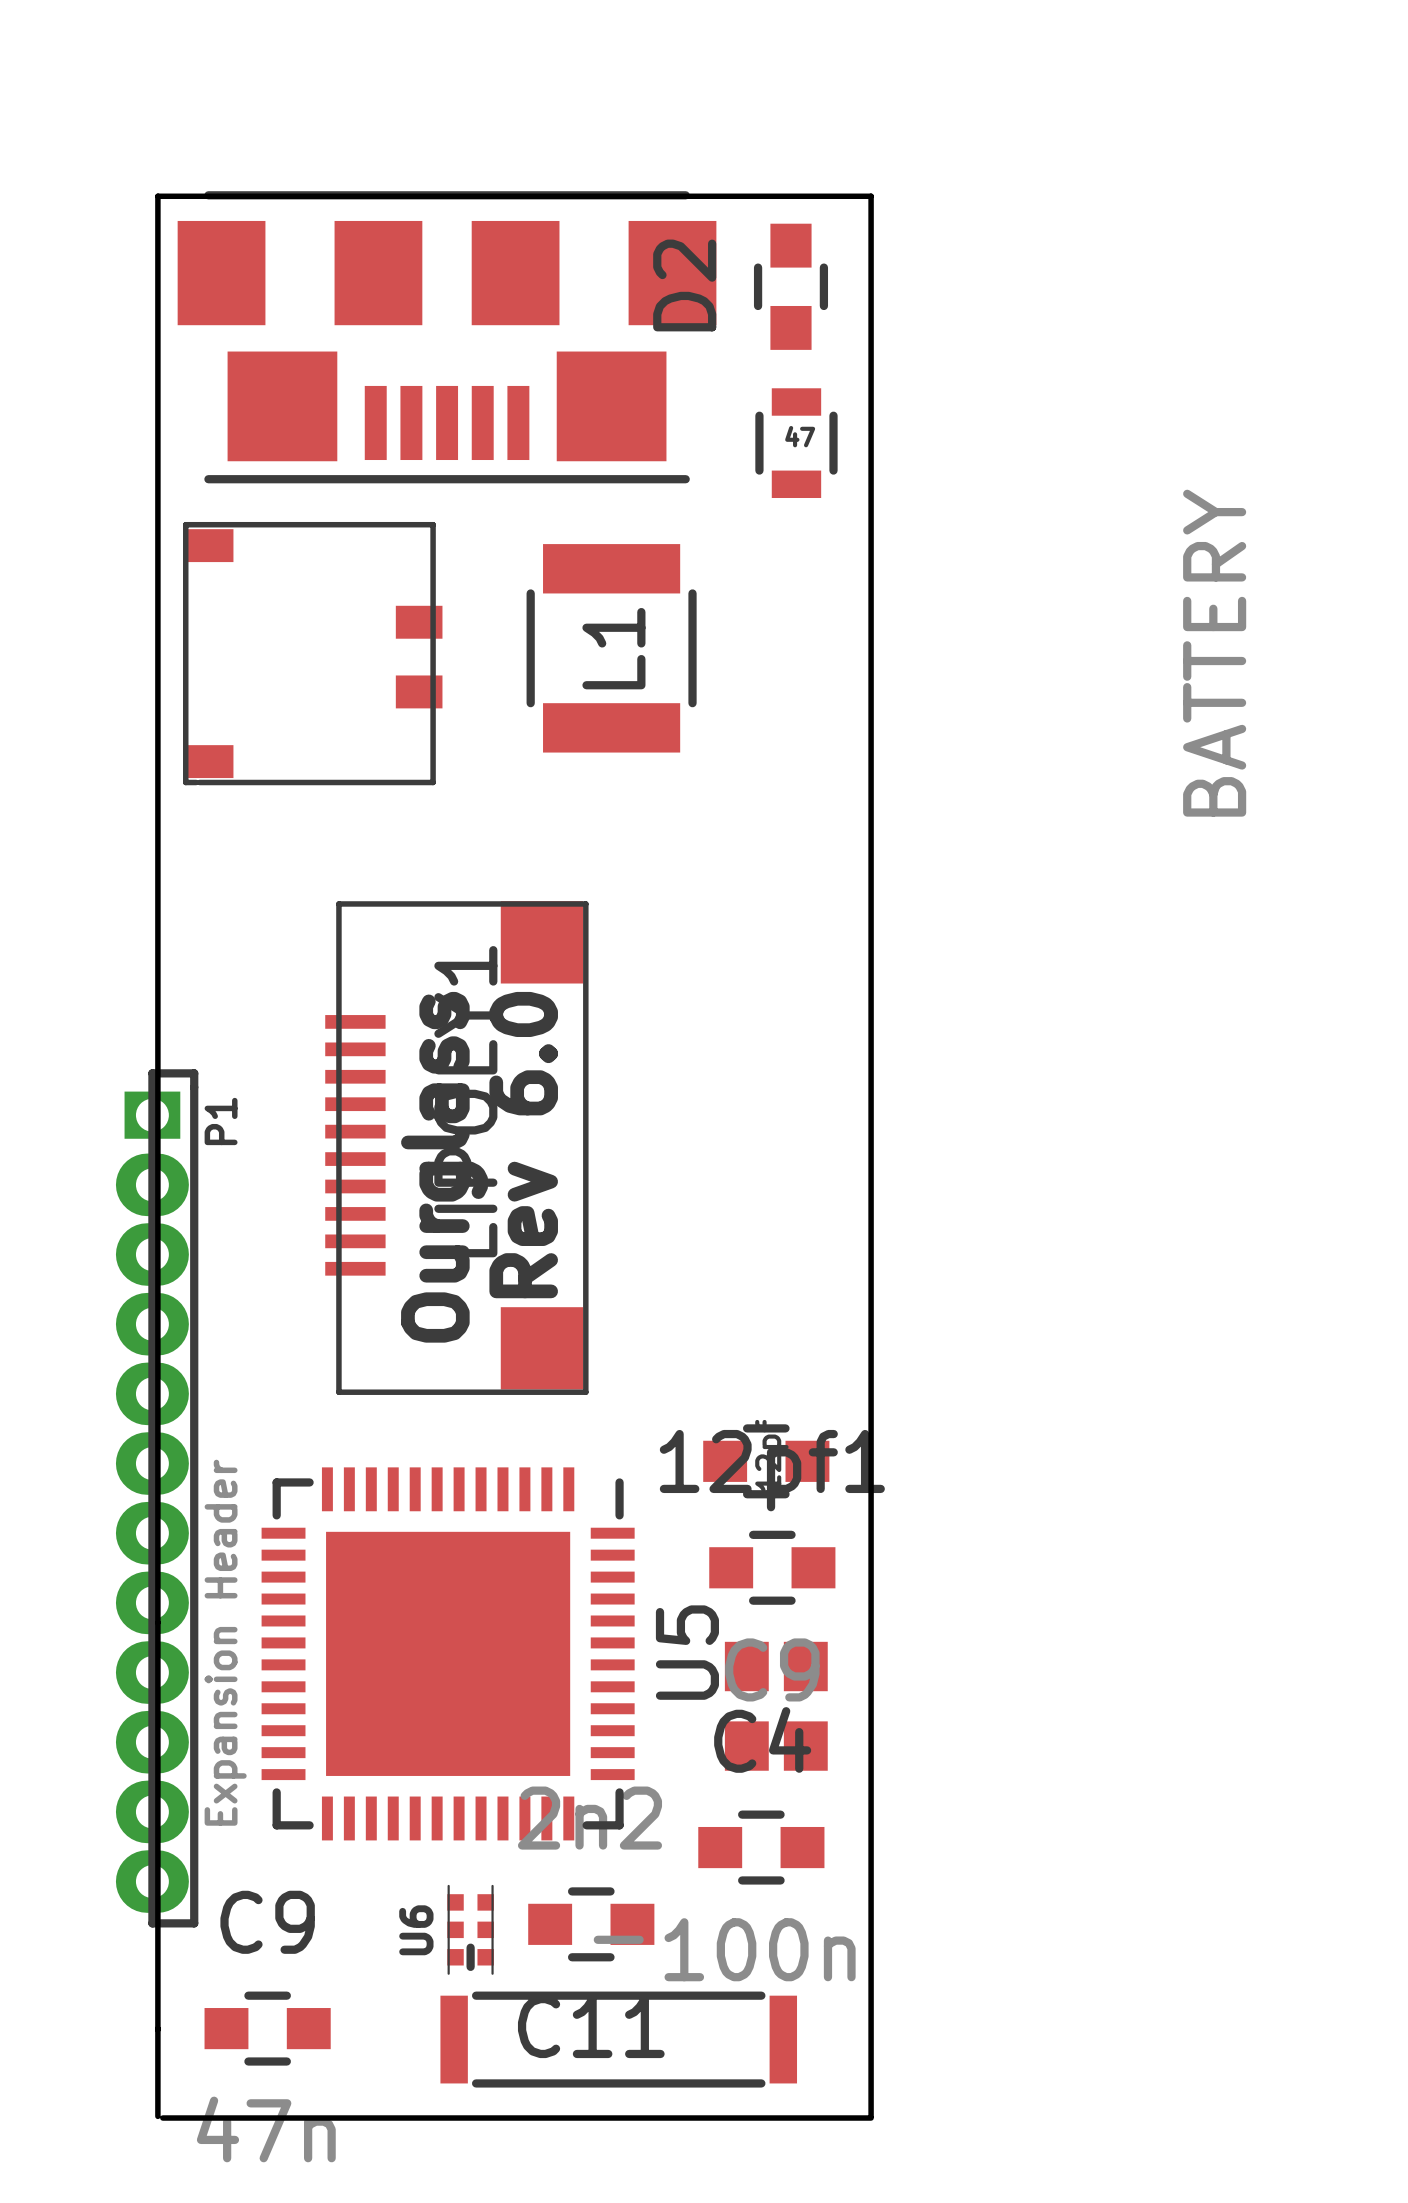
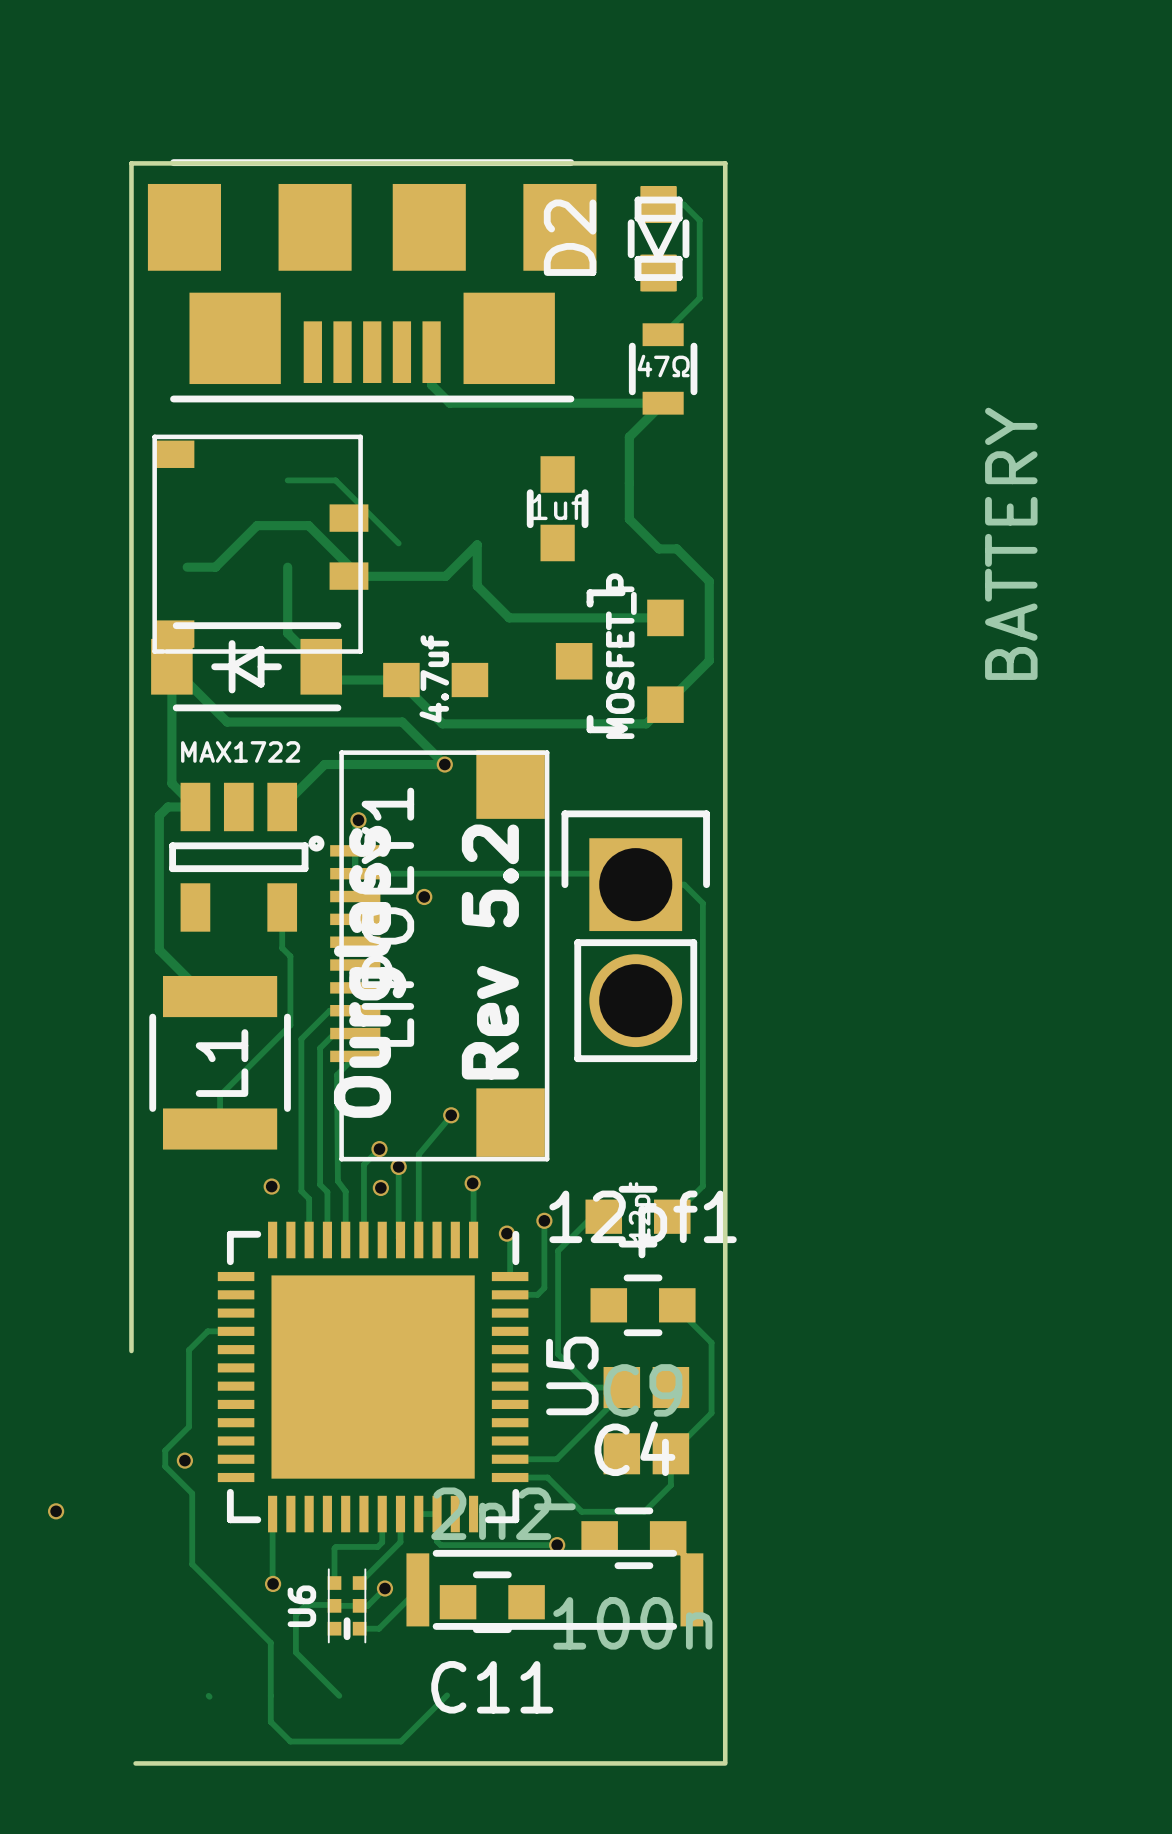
track: none -> (658, 204) (683, 204) (699, 220) (699, 298) (663, 334)
part: none -> (658, 238)
track: none -> (431, 352) (431, 384) (449, 403) (663, 403) (629, 437) (629, 519) (659, 548) (676, 548) (709, 581) (709, 660) (646, 723) (442, 723) (406, 688) (406, 685) (401, 680) (334, 680) (287, 633) (287, 567)
part value: 47 (800, 436) -> 47Ω (663, 366)
track: none -> (287, 480) (335, 480) (398, 543)
part: none -> 1uf (557, 508)
L1 position: (611, 648) -> (220, 1062)
track: none -> (187, 567) (215, 567) (257, 525) (308, 525) (359, 576) (445, 576) (477, 544) (477, 585) (509, 617) (667, 617)
part: none -> MOSFET_P (619, 661)
part: none -> (246, 666)
part: none -> 4.7uf (435, 680)
via: none -> (444, 764)
track: none -> (282, 806) (324, 764) (444, 764) (402, 722) (227, 722) (171, 666) (171, 783) (195, 806) (168, 806) (159, 815) (159, 949) (205, 996) (220, 996)
track: none -> (358, 820) (355, 823) (355, 873) (624, 873) (635, 884) (684, 884) (702, 903) (702, 1186) (673, 1215)
via: none -> (358, 820)
part: none -> MAX1722 (246, 857)
via: none -> (424, 896)
track: none -> (282, 907) (282, 948) (290, 956) (290, 1025) (220, 1095) (220, 1129)
part: none -> (635, 936)
text: Rev 6.0 (523, 1145) -> Rev 5.2 (490, 952)
part position: (456, 1148) -> (439, 955)
track: none -> (355, 1010) (329, 1010) (301, 1039) (301, 1191) (309, 1198) (309, 1240)
track: none -> (355, 1033) (334, 1033) (320, 1048) (320, 1184) (327, 1192) (327, 1240)
track: none -> (355, 1056) (337, 1075) (337, 1181) (345, 1191) (345, 1240)
via: none -> (451, 1115)
track: none -> (451, 1115) (418, 1154) (418, 1240)
track: none -> (379, 1149) (363, 1164) (363, 1240)
via: none -> (379, 1149)
track: none -> (398, 1166) (398, 1238) (400, 1240)
via: none -> (398, 1166)
track: none -> (472, 1183) (473, 1240)
via: none -> (472, 1183)
via: none -> (271, 1186)
via: none -> (380, 1187)
track: none -> (603, 1216) (592, 1216) (558, 1250) (558, 1354) (591, 1387) (621, 1387) (621, 1394) (556, 1459) (510, 1459)
track: none -> (544, 1220) (544, 1287) (537, 1294) (510, 1294)
via: none -> (544, 1220)
track: none -> (506, 1233) (510, 1236) (510, 1276)
via: none -> (506, 1233)
P1: Expansion Header (157, 1498) -> none
track: none -> (675, 1299) (675, 1306) (711, 1342) (711, 1413) (670, 1453) (670, 1485) (644, 1511) (581, 1511) (547, 1477) (510, 1477)
track: none -> (236, 1331) (207, 1331) (189, 1350) (189, 1426) (165, 1450) (165, 1466) (192, 1493) (192, 1564) (270, 1642) (270, 1721) (290, 1741) (400, 1741) (447, 1695)
board edge: (157, 1622) (157, 2116) -> none
via: none -> (184, 1460)
via: none -> (56, 1511)
track: none -> (272, 1514) (272, 1583)
track: none -> (382, 1514) (382, 1542) (377, 1546) (336, 1546) (334, 1548) (334, 1583)
track: none -> (400, 1514) (400, 1542) (359, 1583)
track: none -> (418, 1514) (437, 1514) (437, 1541) (440, 1545) (557, 1545)
via: none -> (557, 1545)
via: none -> (273, 1583)
track: none -> (384, 1588) (367, 1605) (305, 1604) (295, 1615) (295, 1652) (339, 1695)
via: none -> (384, 1588)
track: none -> (417, 1589) (379, 1628) (359, 1628)
U6 position: (470, 1929) -> (347, 1605)
C9: 47n (267, 2028) -> none
track: none -> (208, 1695) (209, 1696)
part position: (618, 2039) -> (554, 1589)

